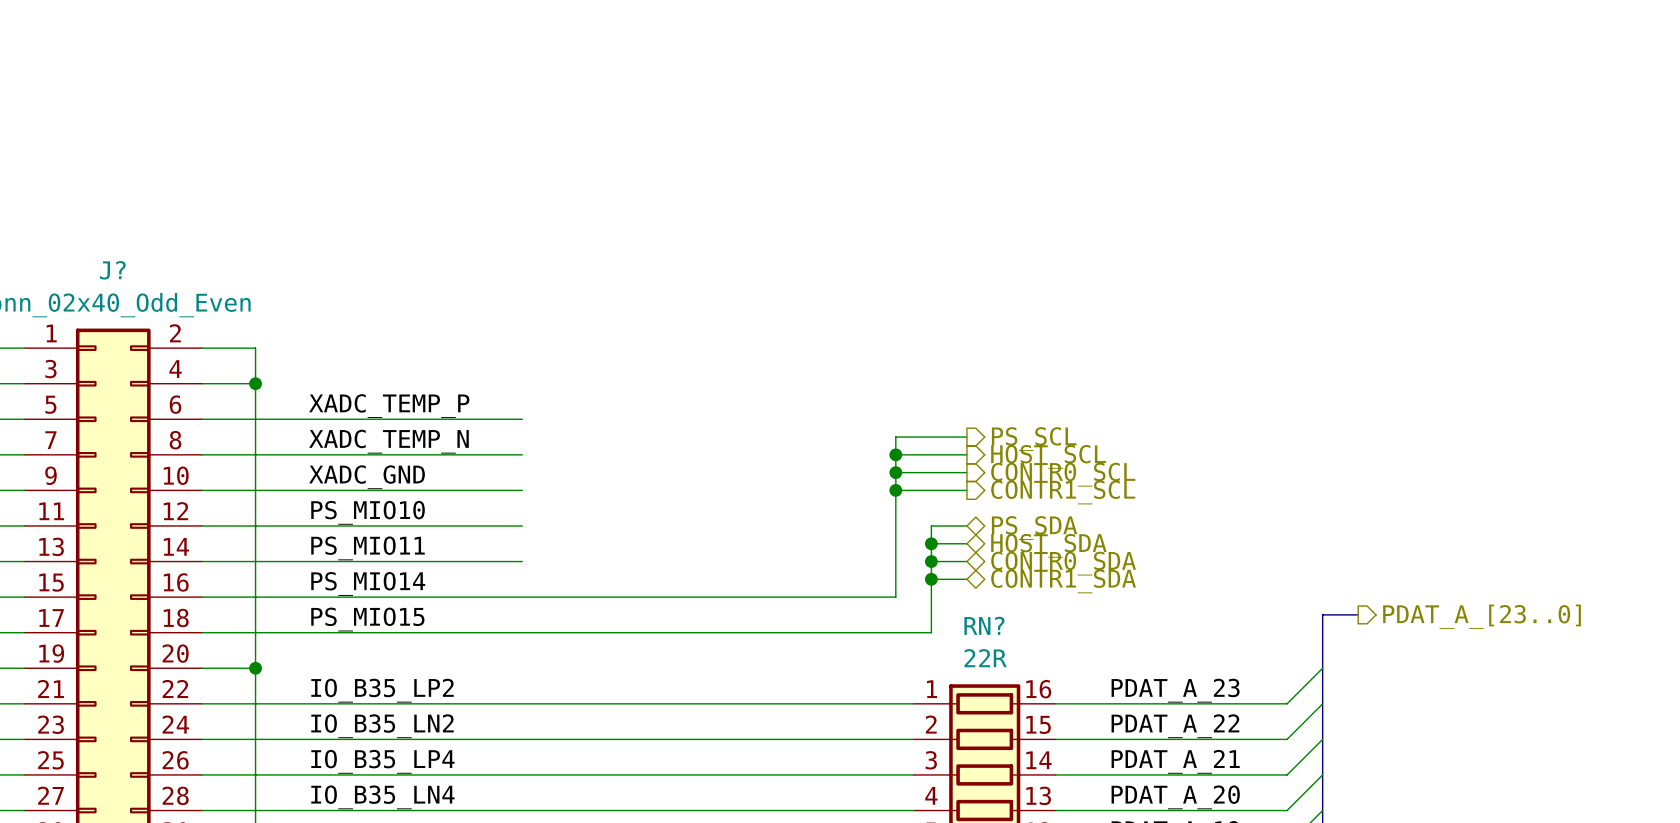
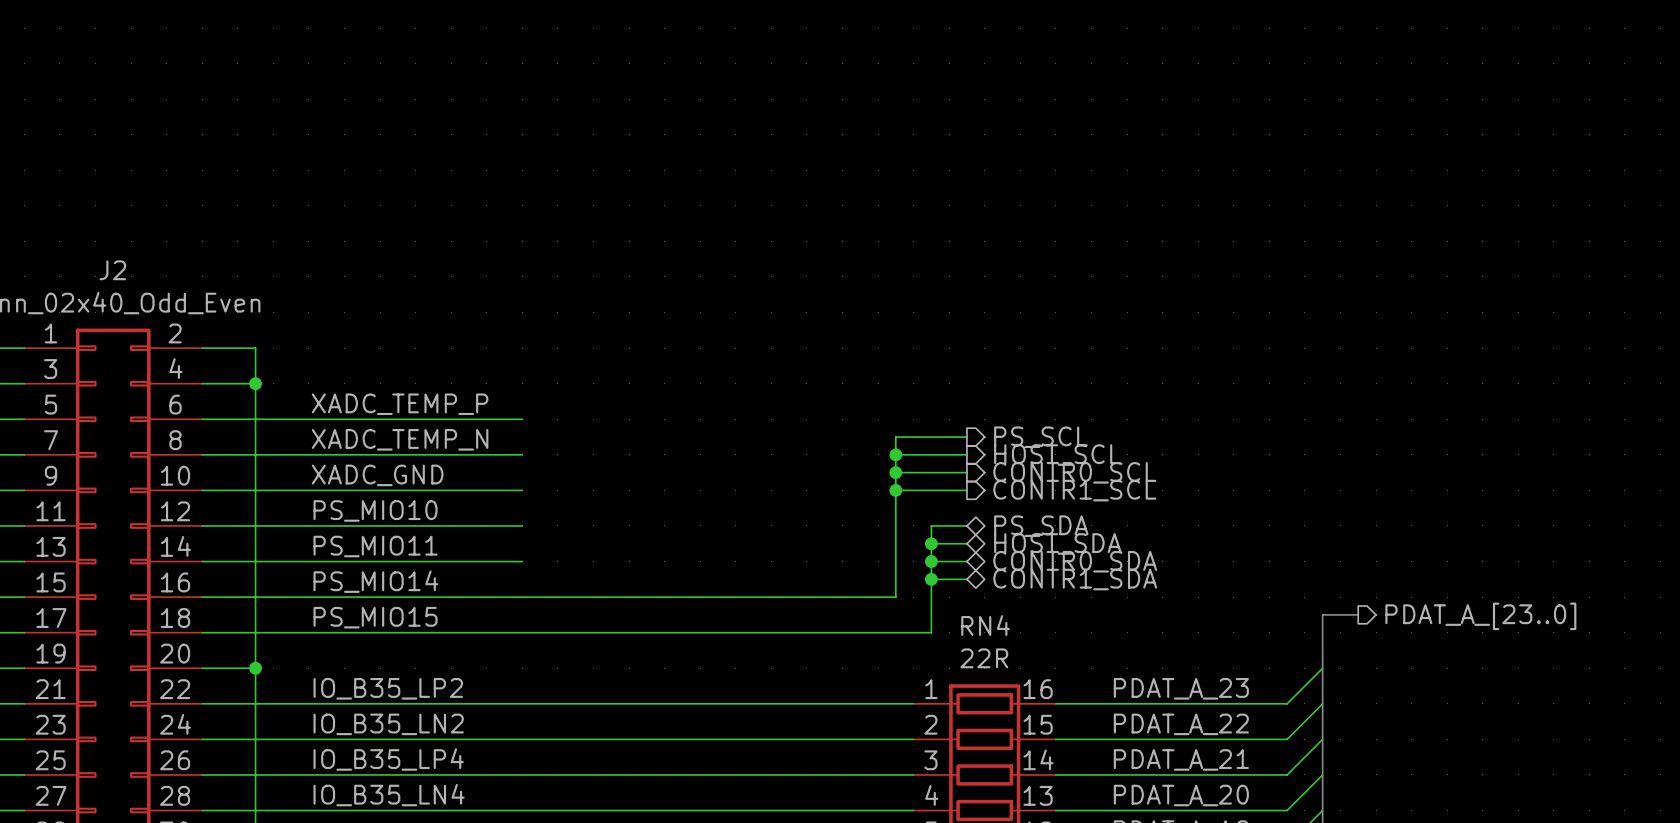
J? name: J? (112, 270) -> J2 (112, 270)
RN? name: RN? (984, 625) -> RN4 (985, 625)

